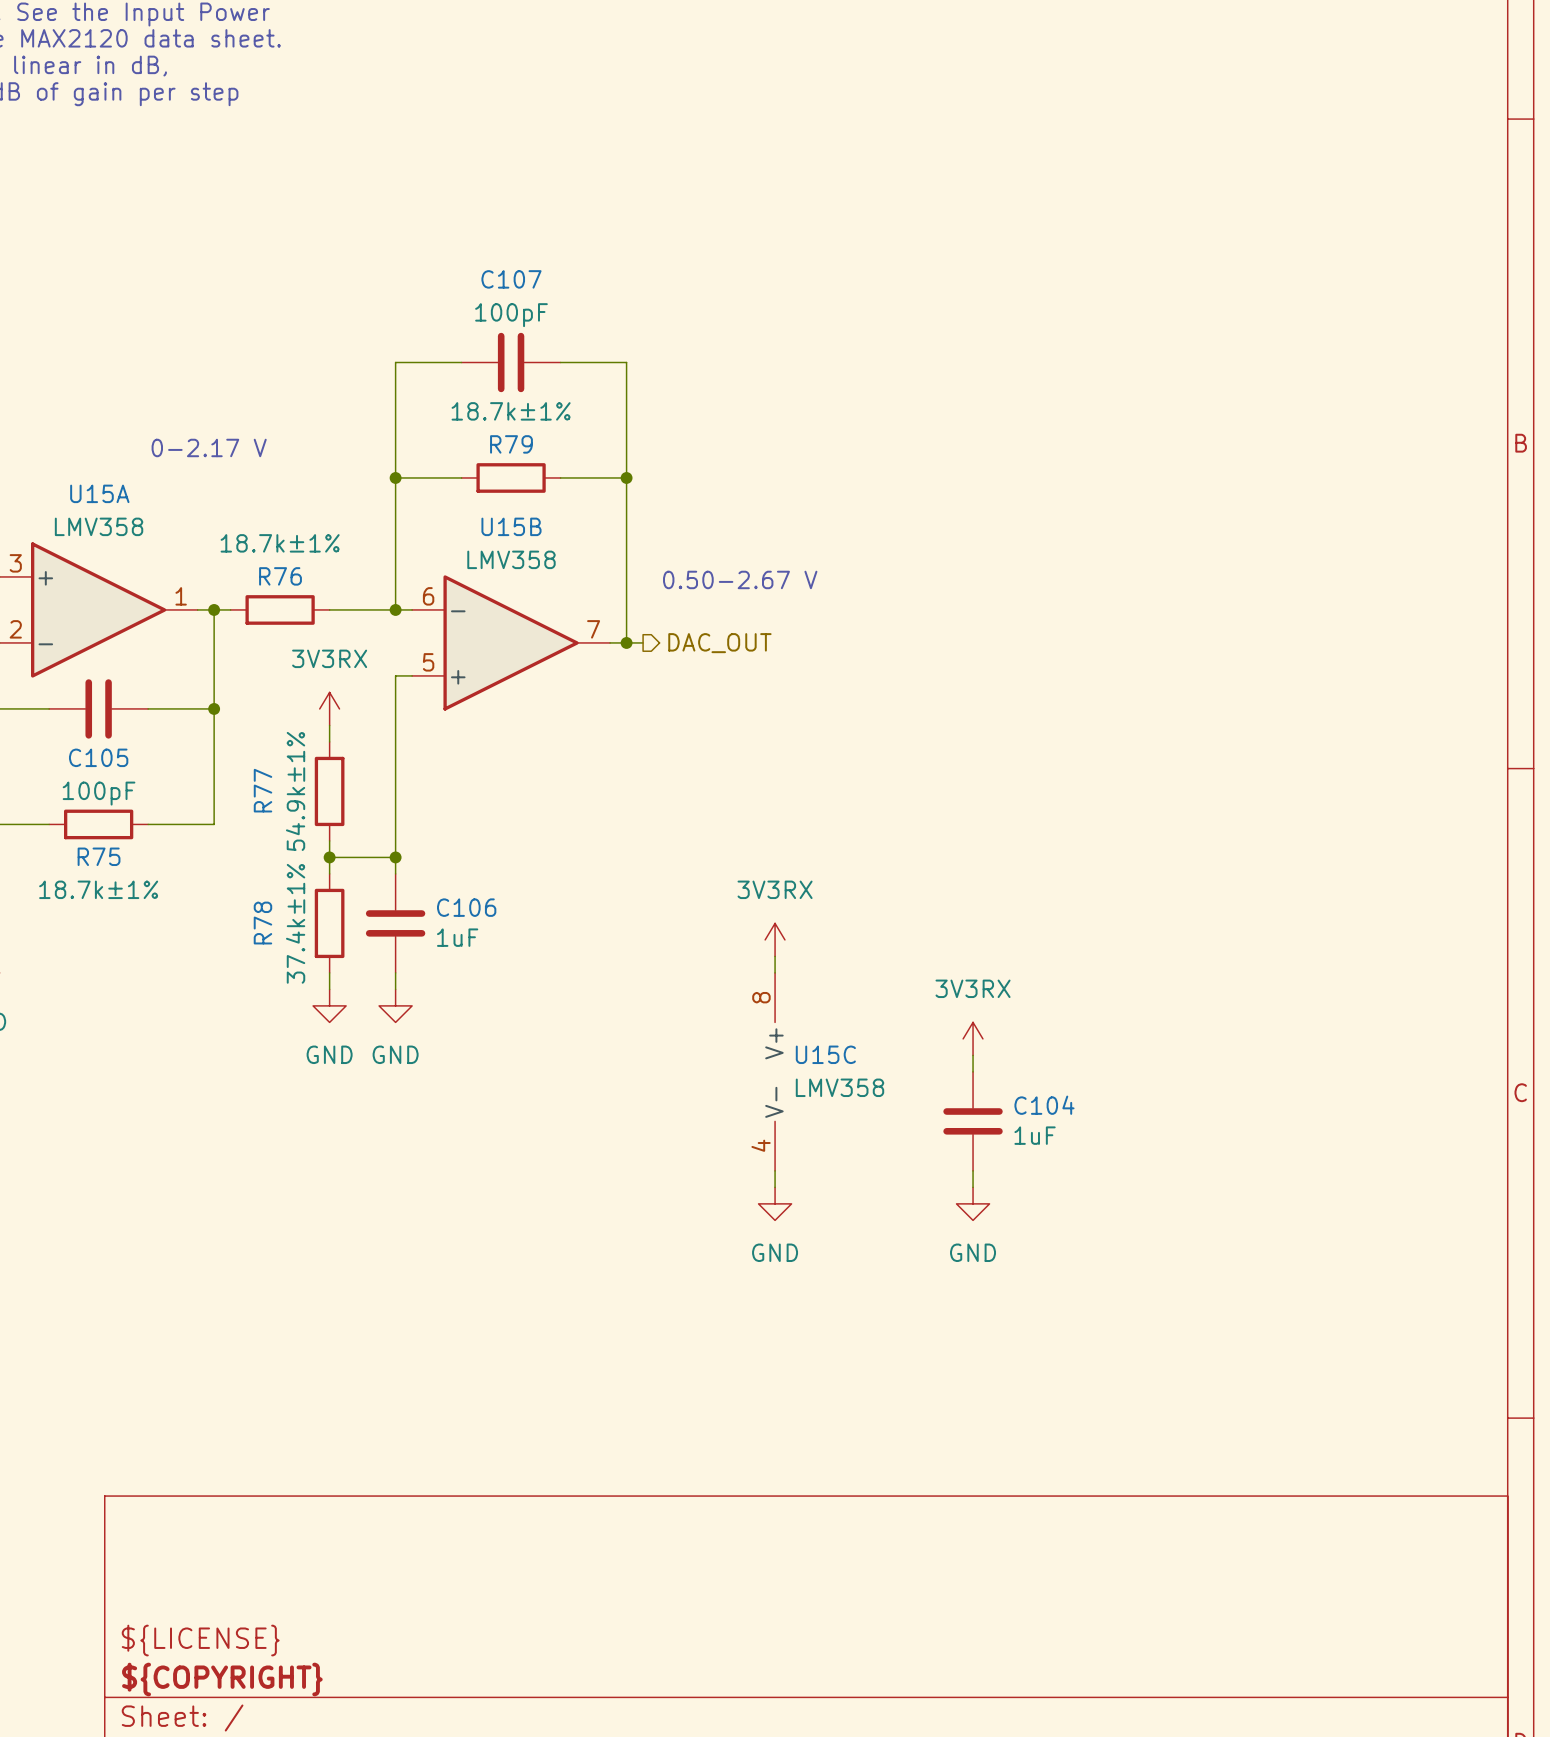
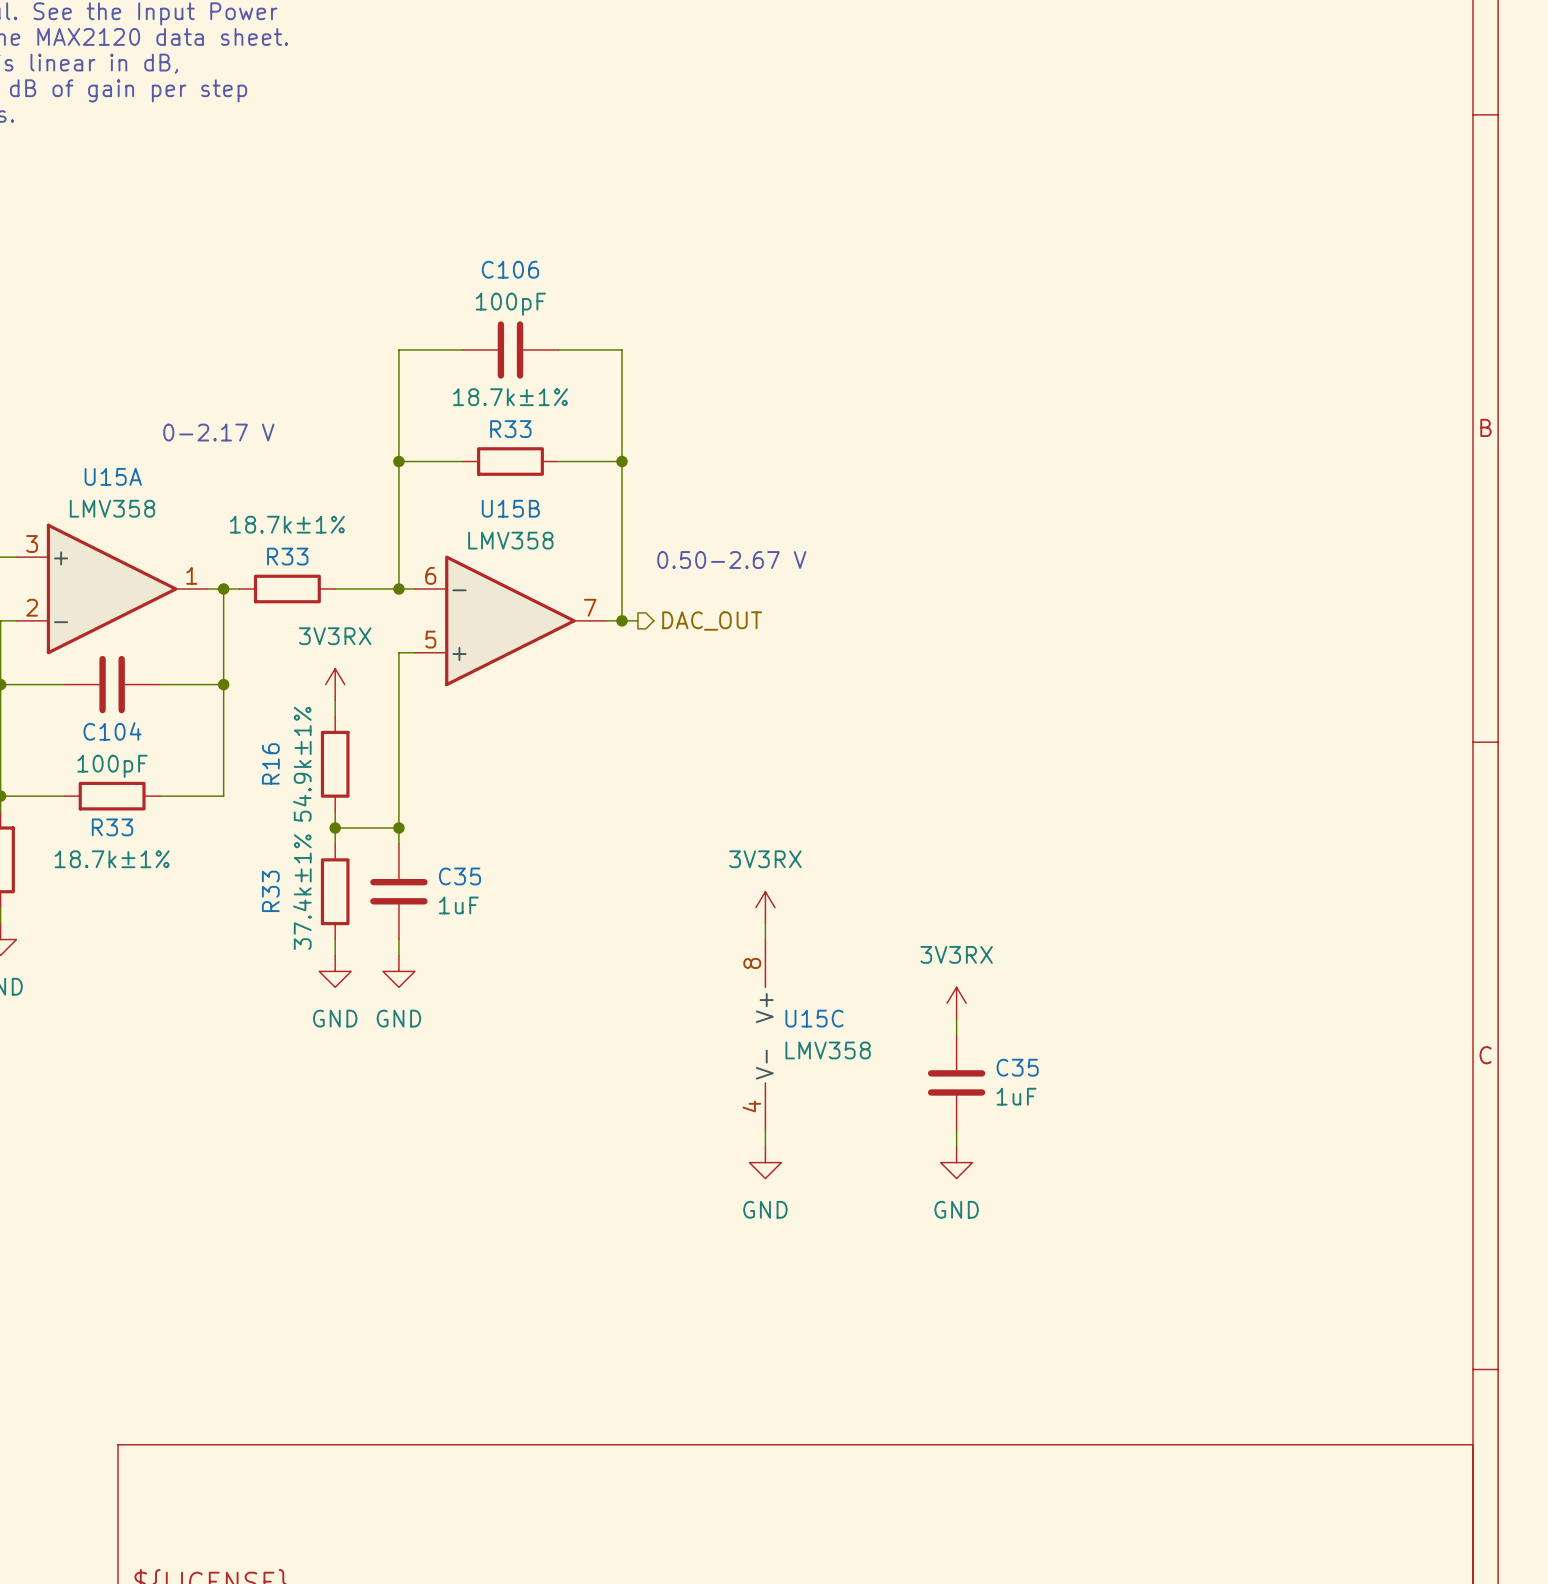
C107 name: C107 (511, 279) -> C106 (510, 269)
R79 name: R79 (511, 444) -> R33 (510, 429)
R76 name: R76 (280, 576) -> R33 (287, 556)
C105 name: C105 (98, 757) -> C104 (112, 731)
R77 name: R77 (263, 790) -> R16 (270, 763)
R75 name: R75 (99, 856) -> R33 (112, 827)
C106 name: C106 (466, 907) -> C35 (459, 876)
R78 name: R78 (262, 923) -> R33 (270, 891)
C104 name: C104 (1044, 1105) -> C35 (1017, 1067)

